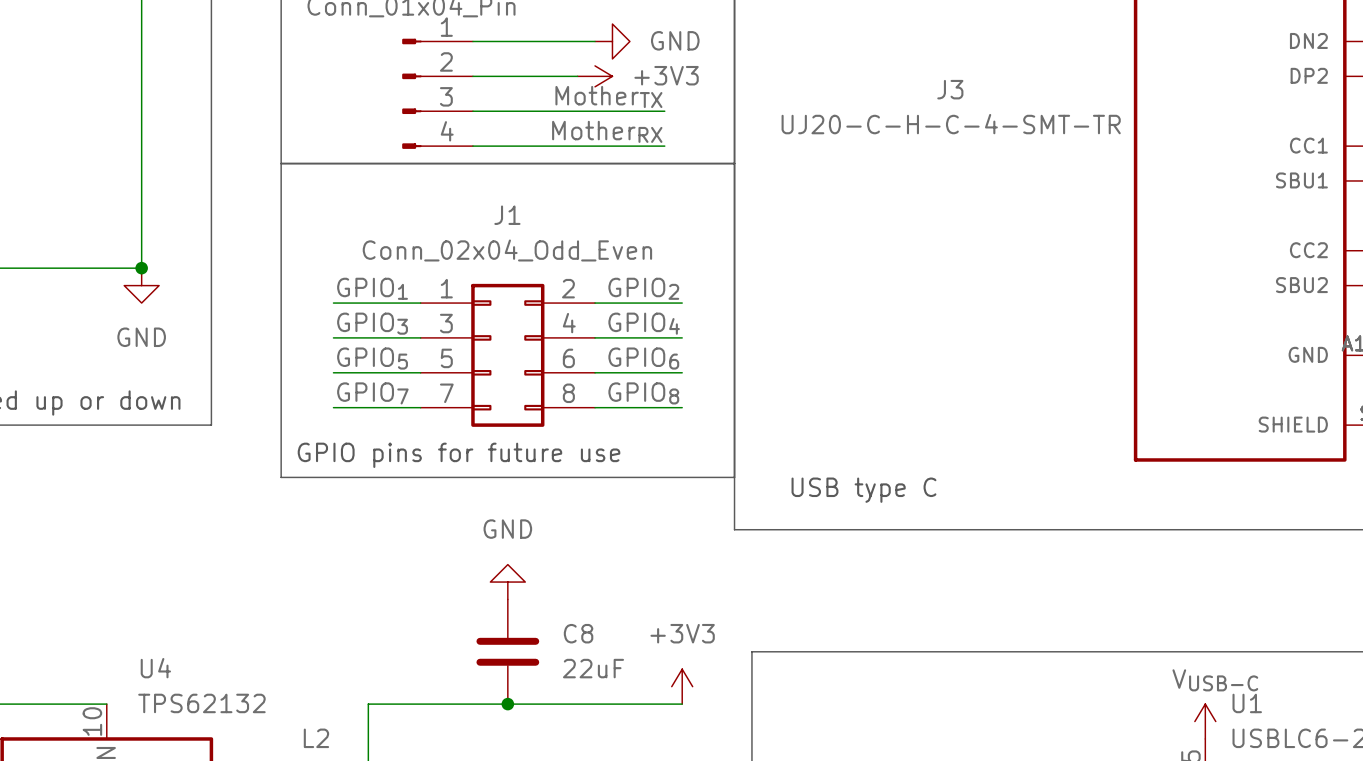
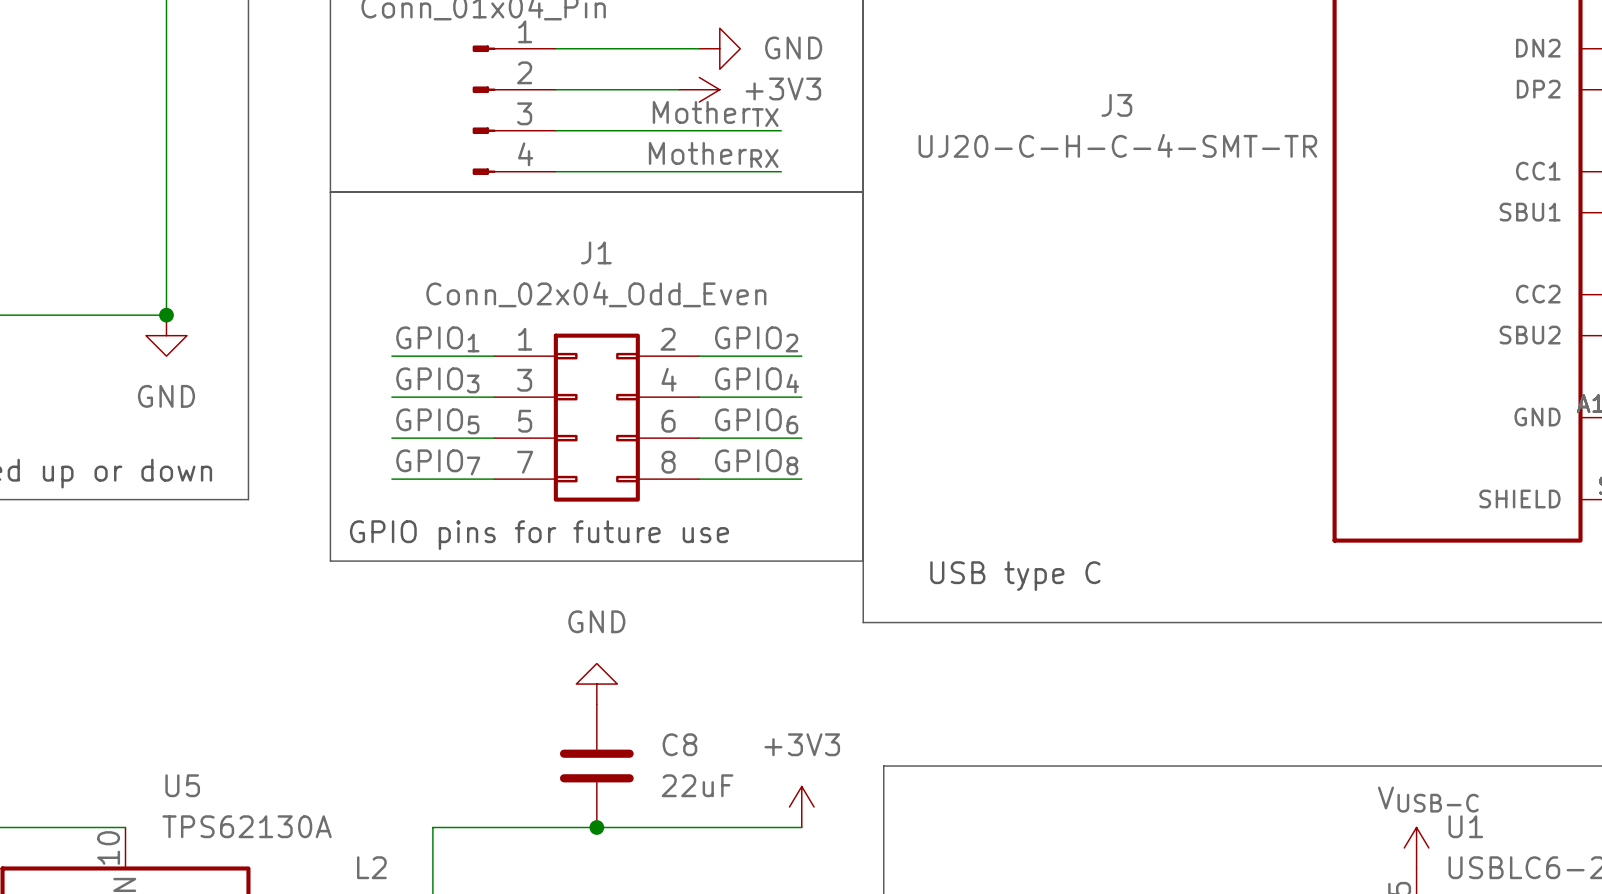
U4 name: U4 (155, 668) -> U5 (182, 785)
U4 value: TPS62132 (201, 703) -> TPS62130A (247, 826)

